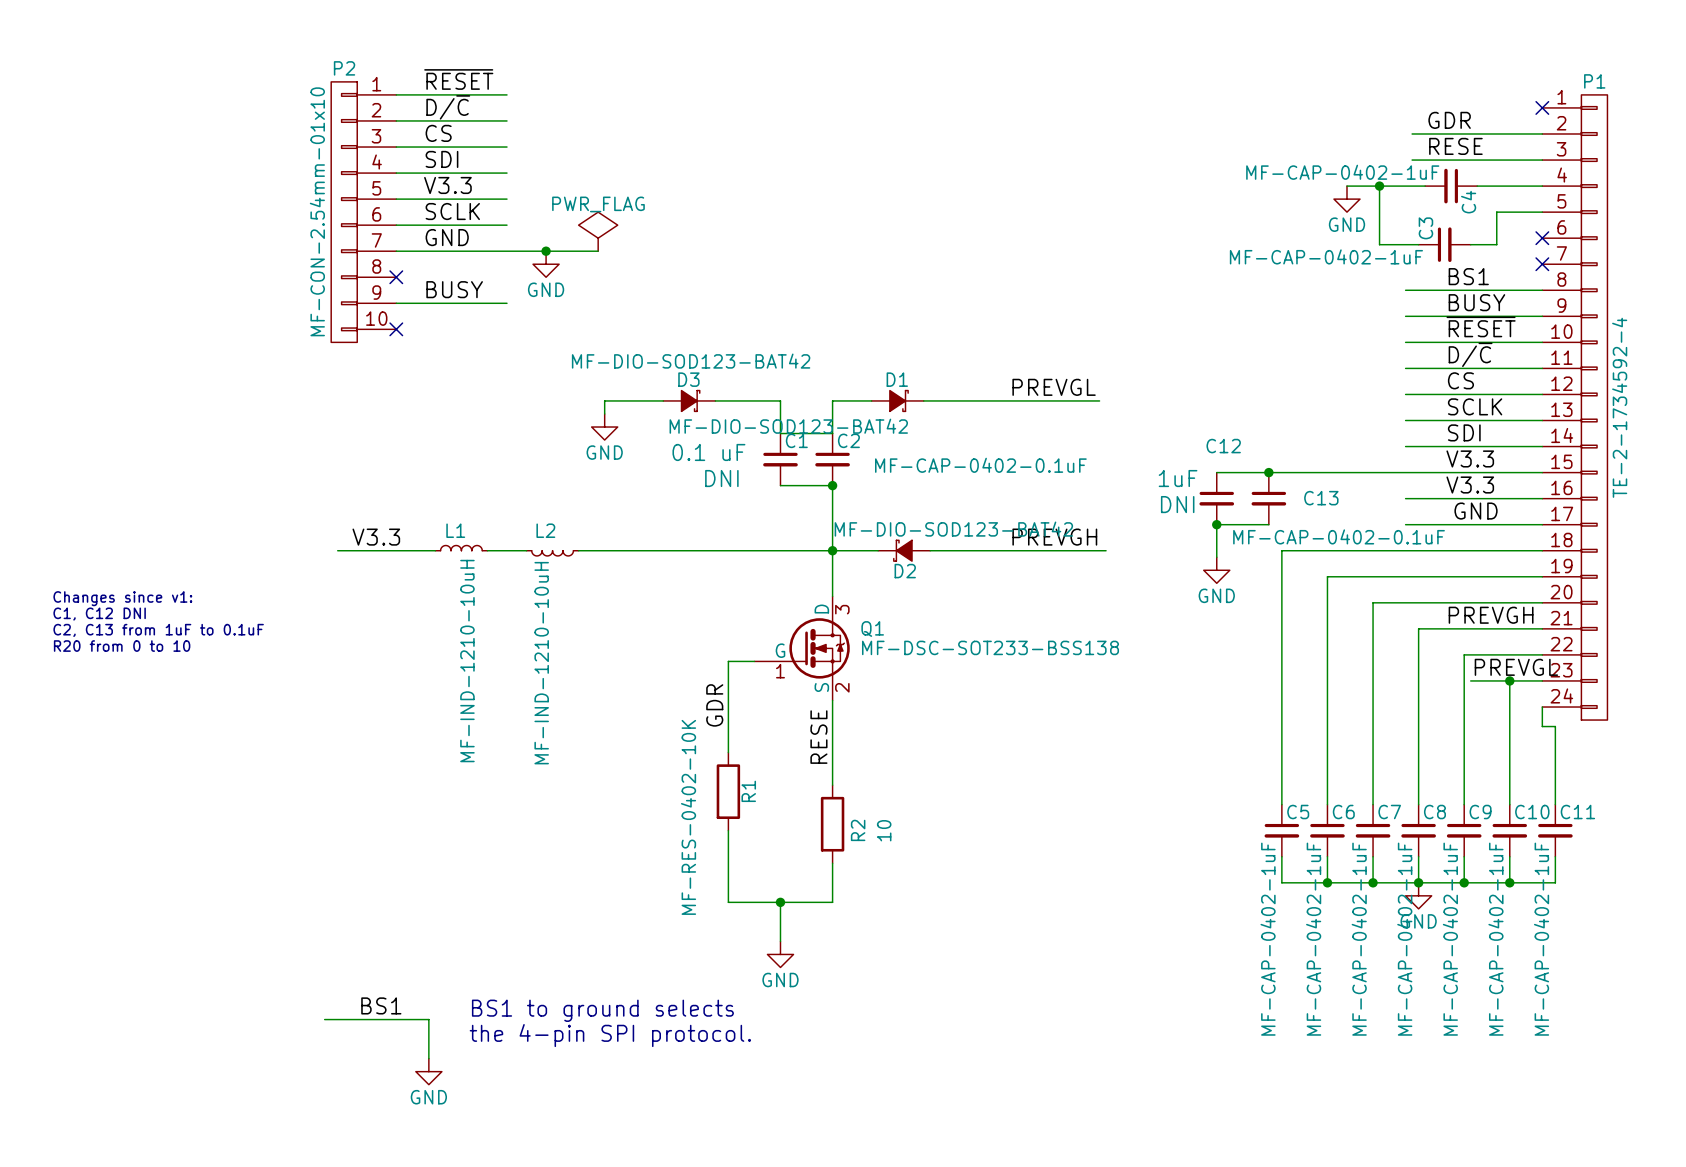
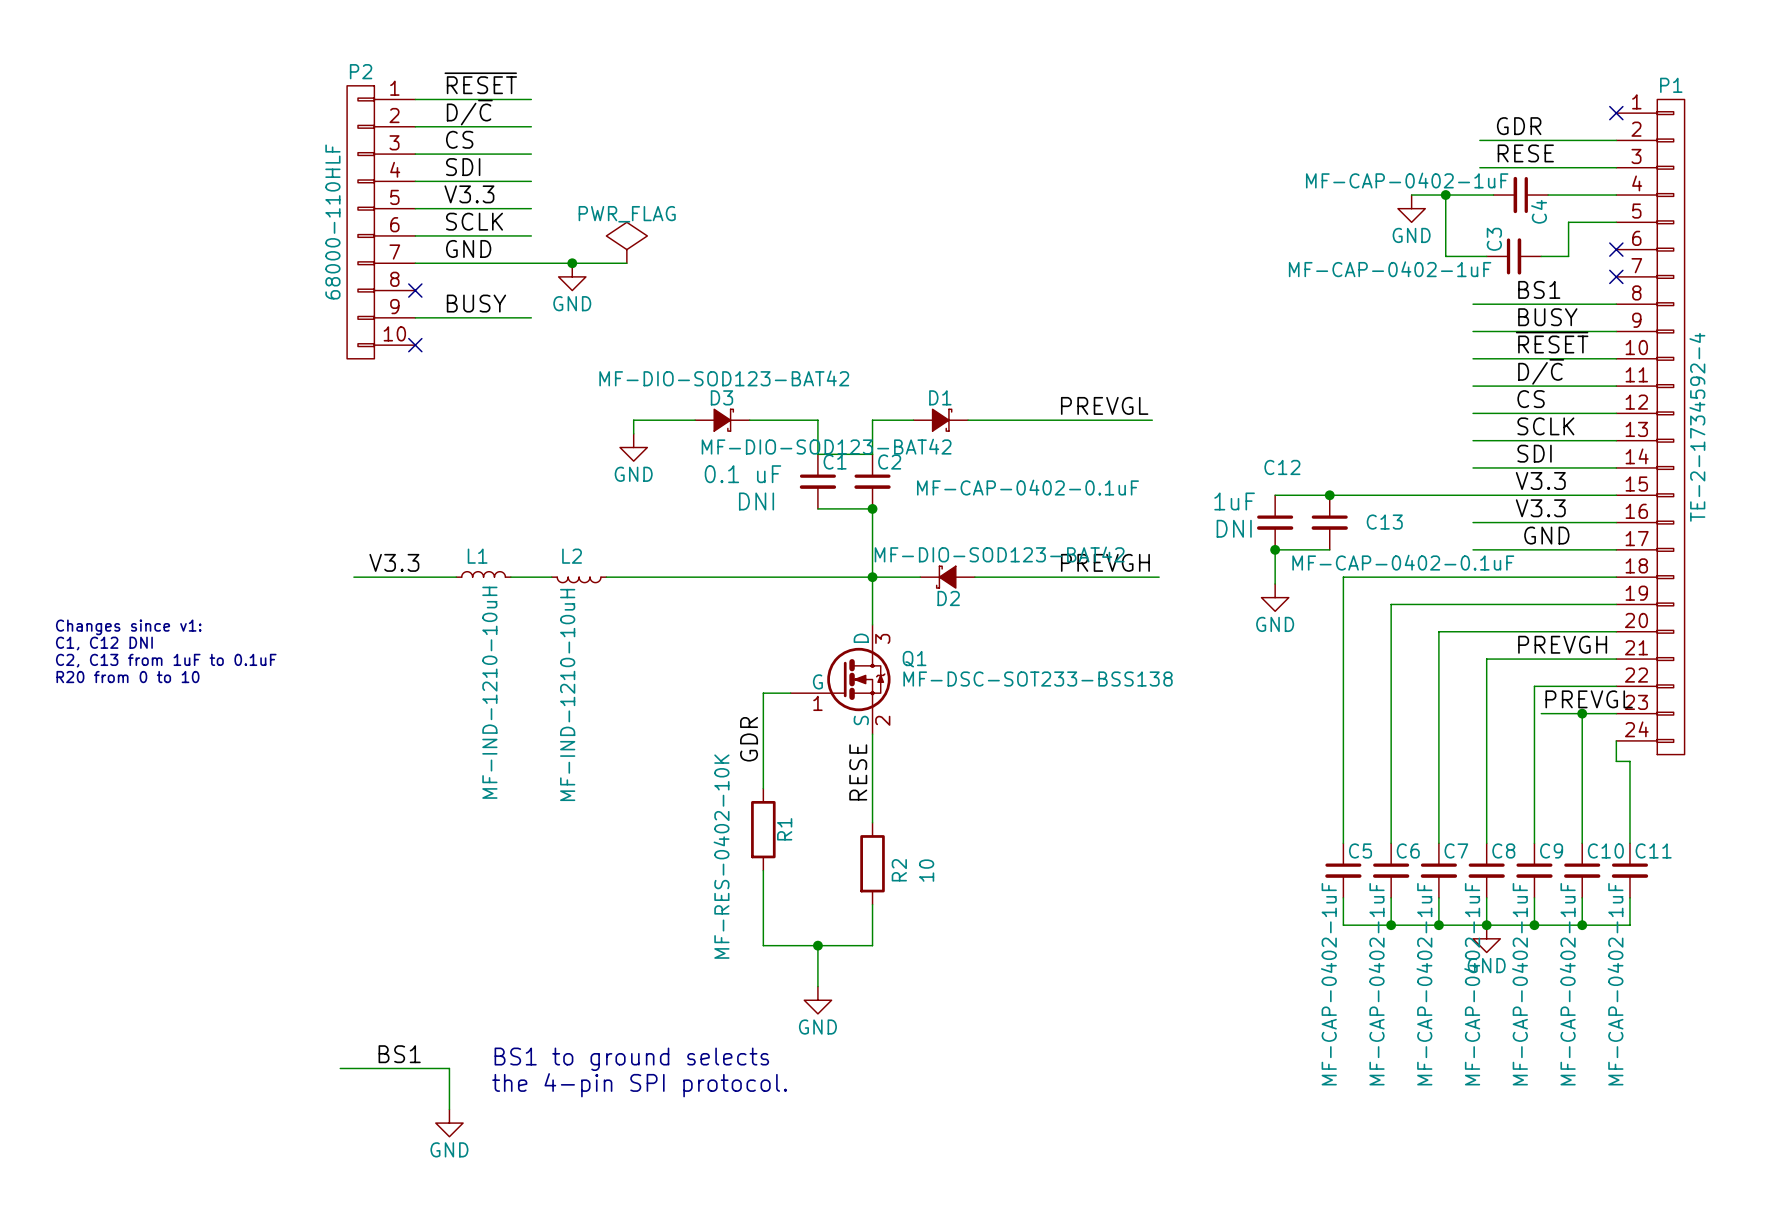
P2 value: MF-CON-2.54mm-01x10 (317, 211) -> 68000-110HLF (332, 221)

